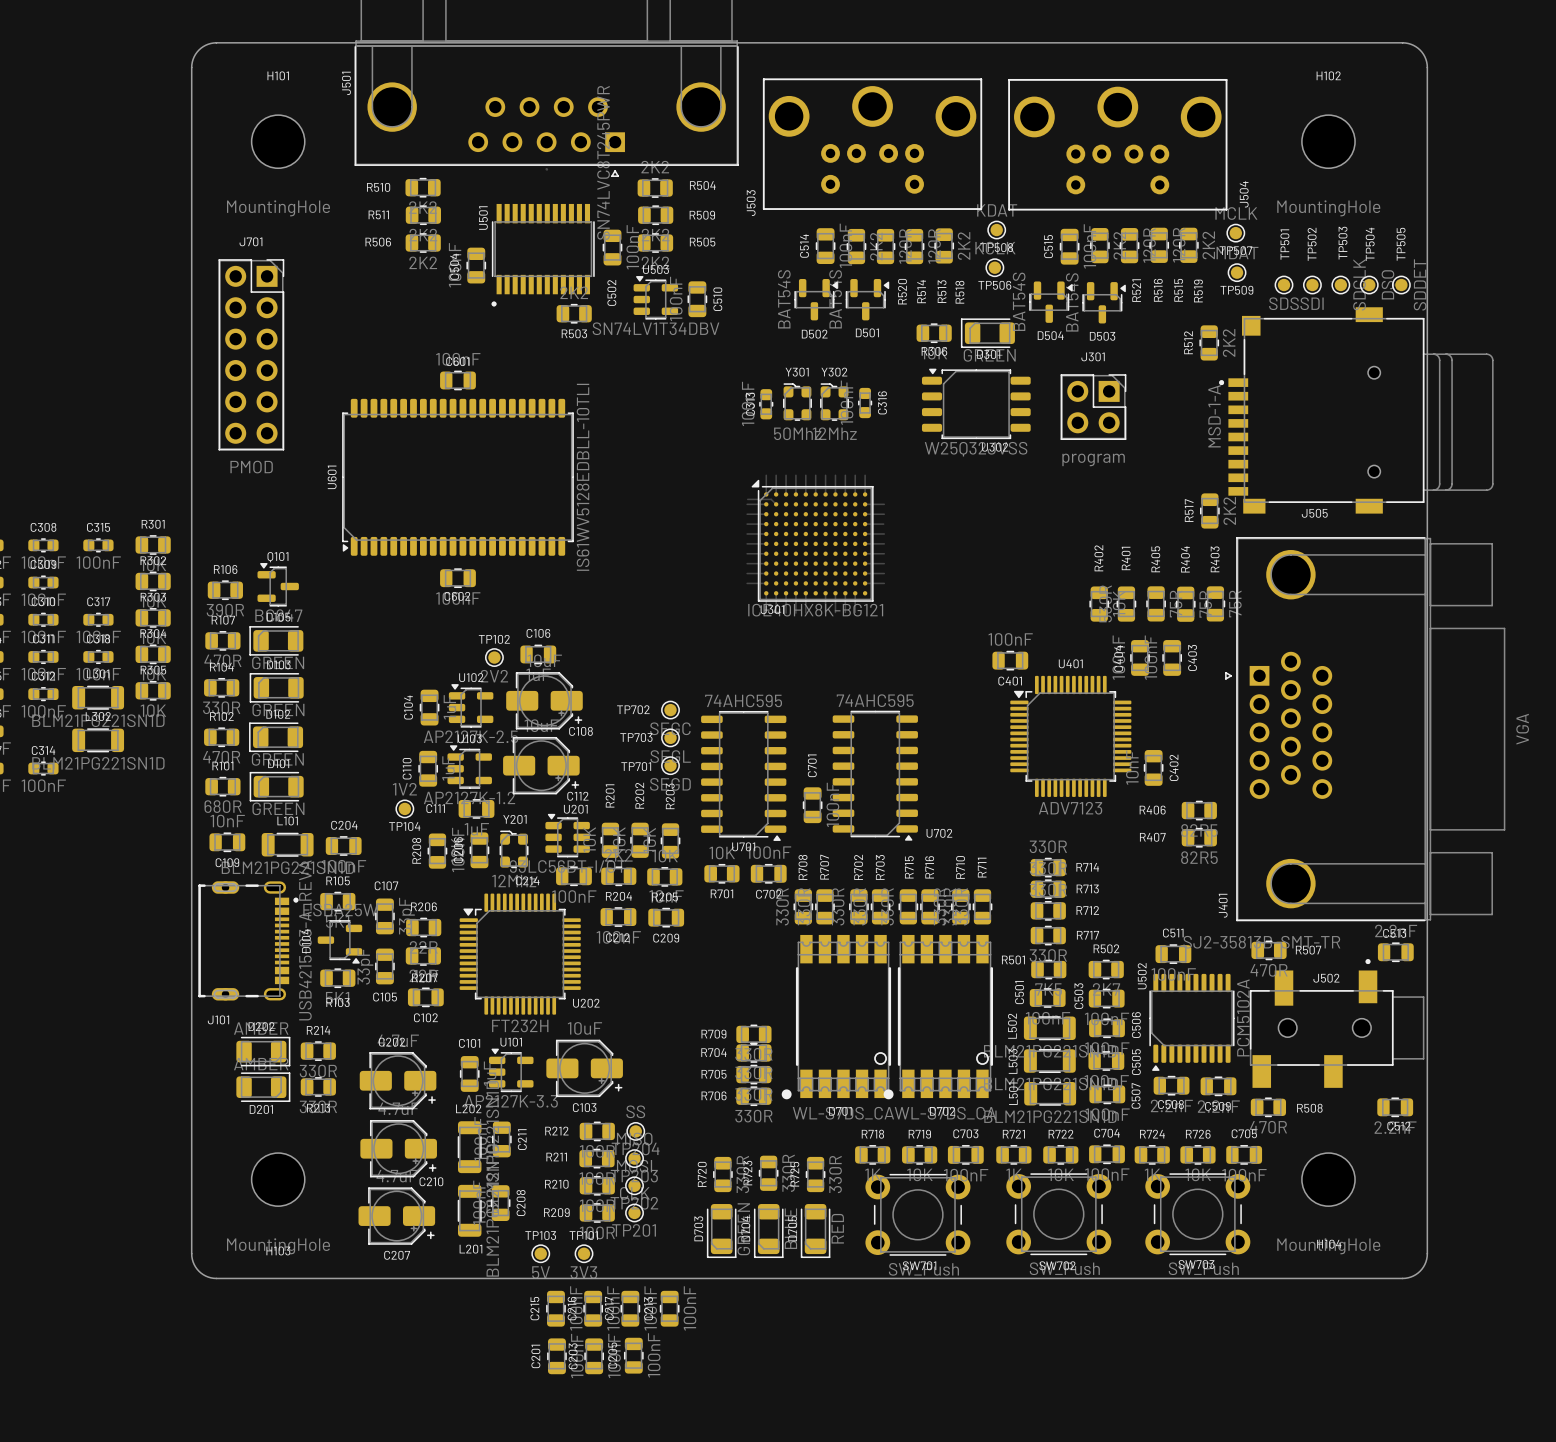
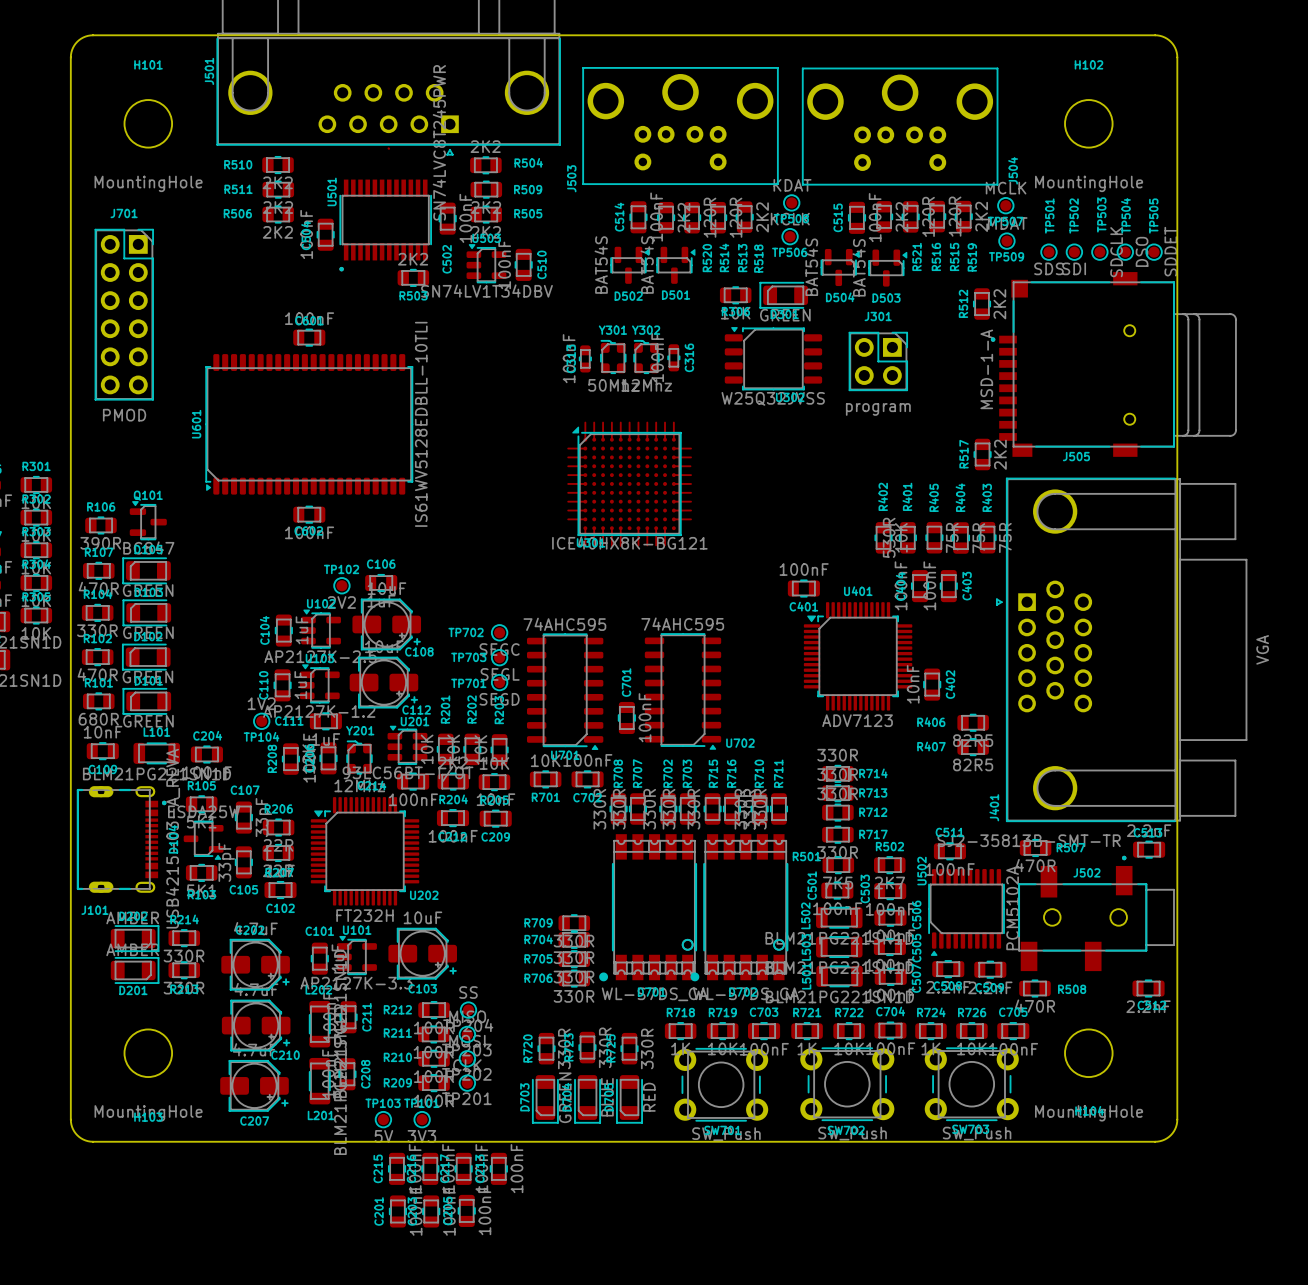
track: (747, 499) (771, 499) (776, 504) -> none

